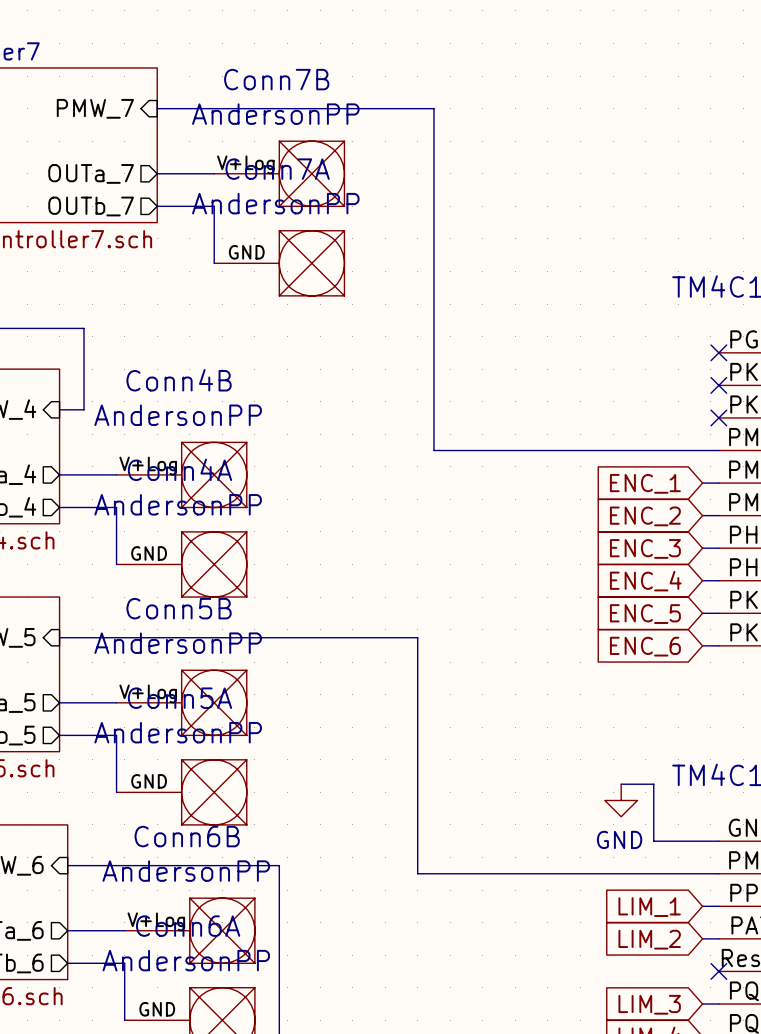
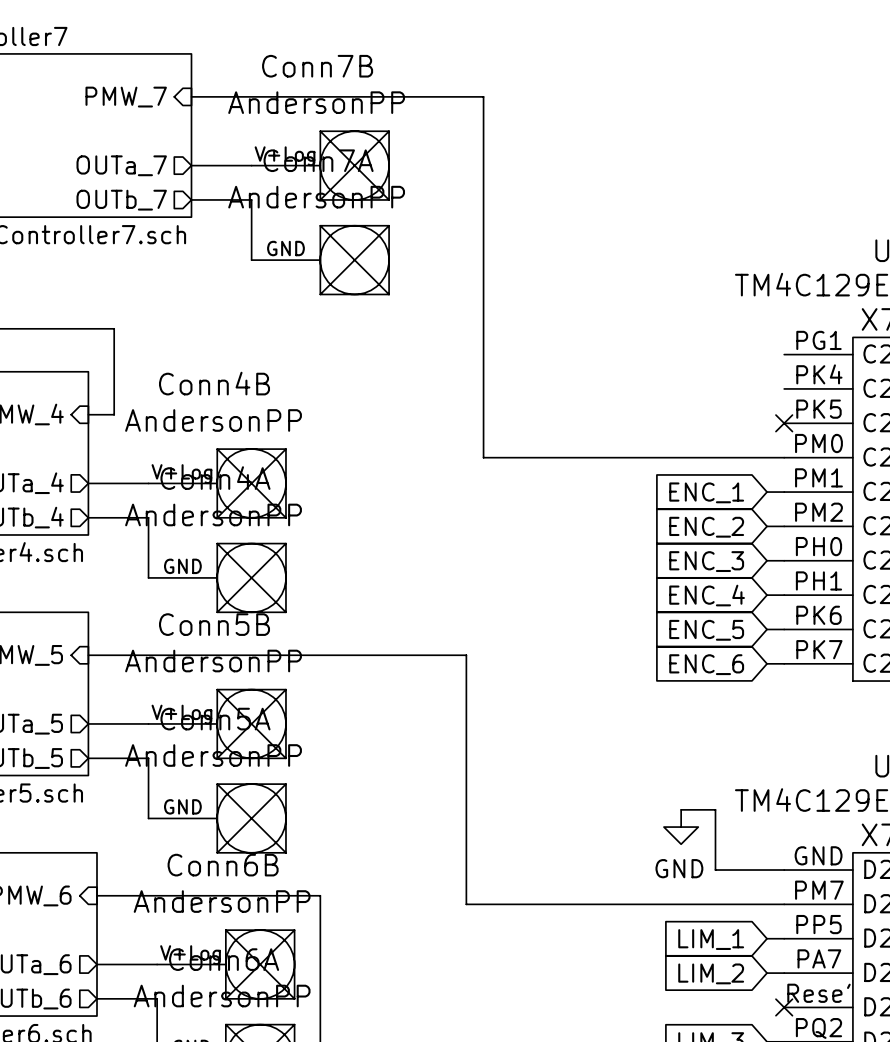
no-connect mark: (718, 352) -> none
no-connect mark: (718, 385) -> none

